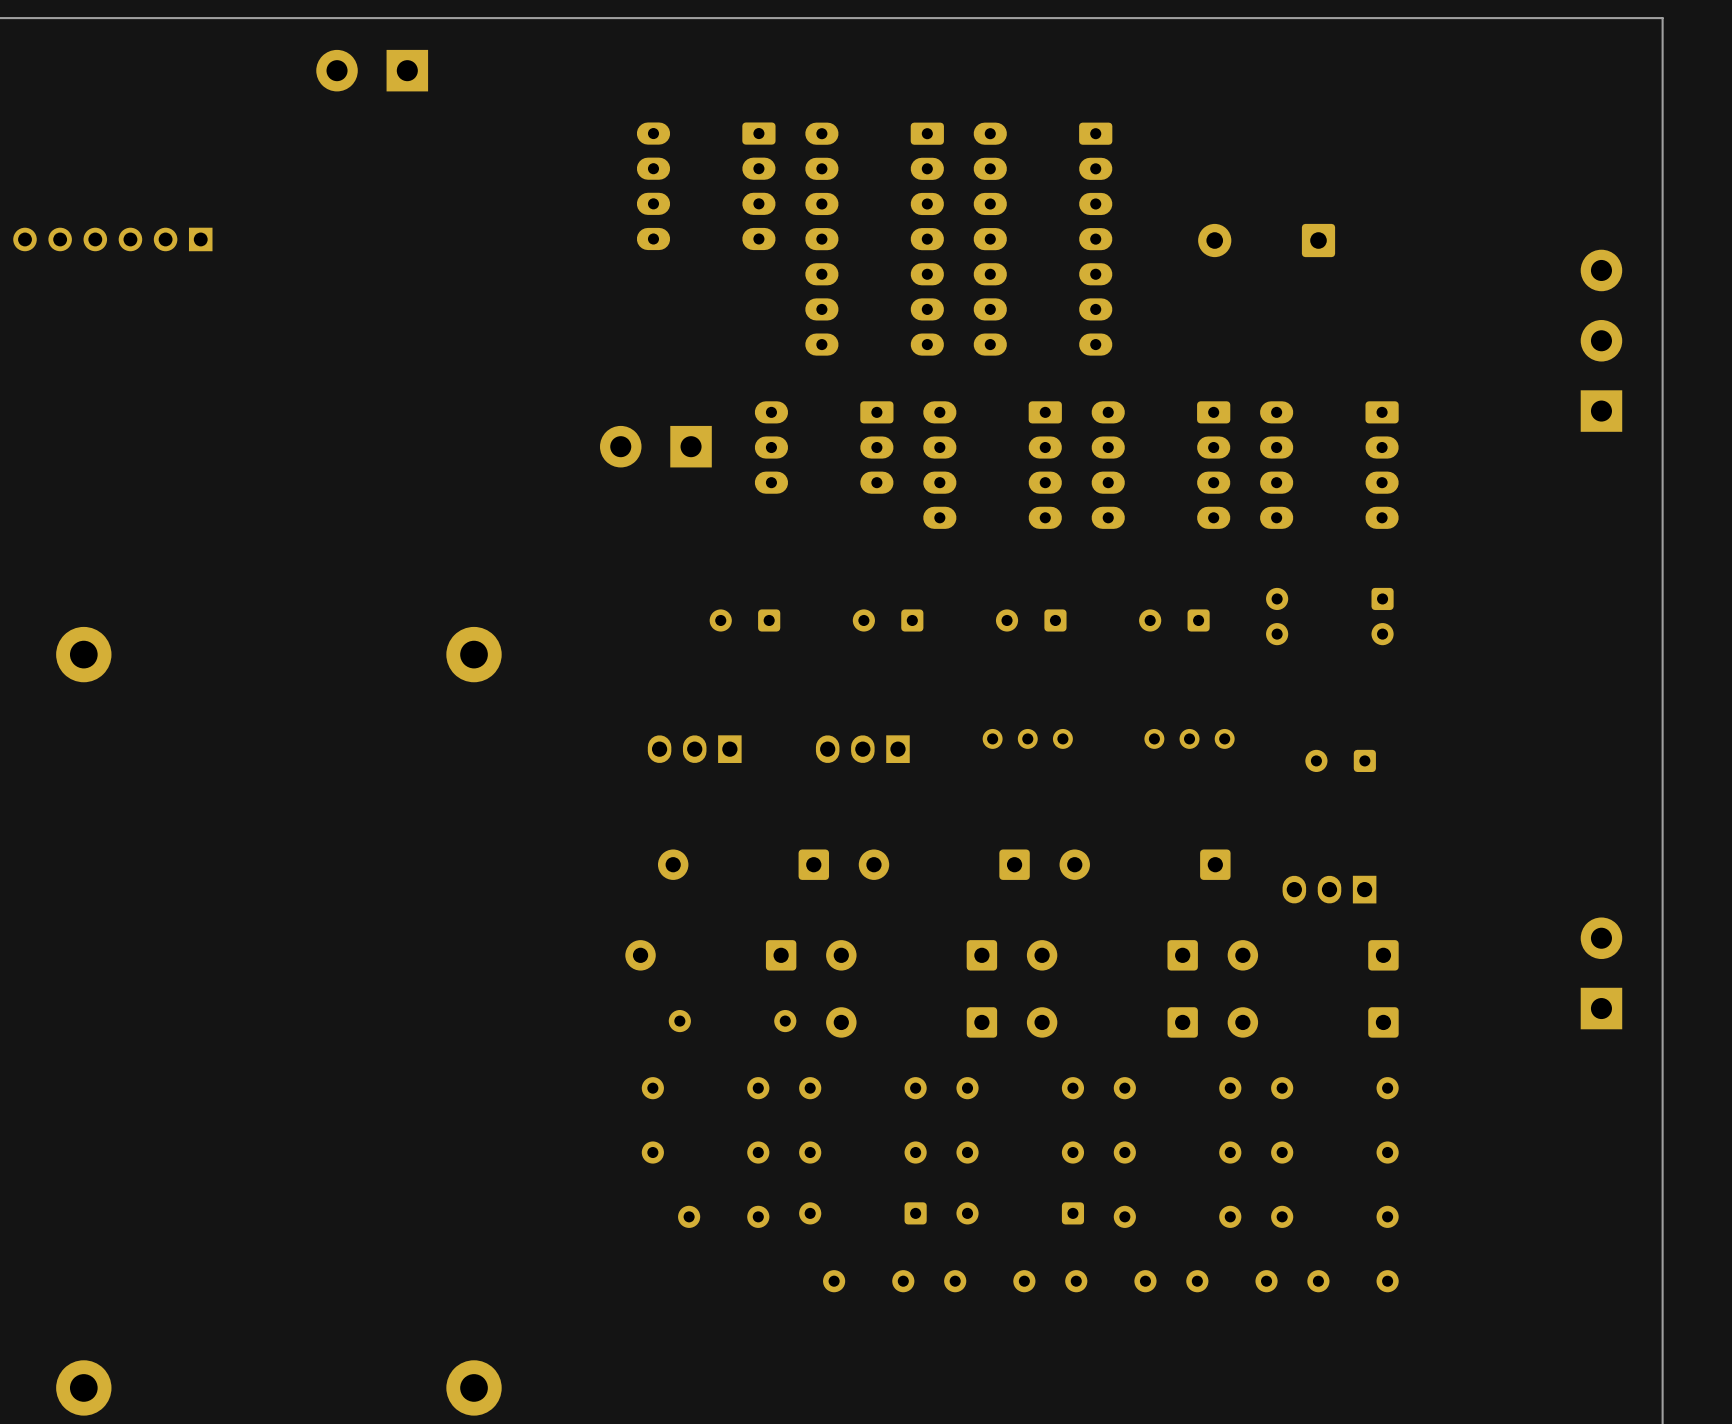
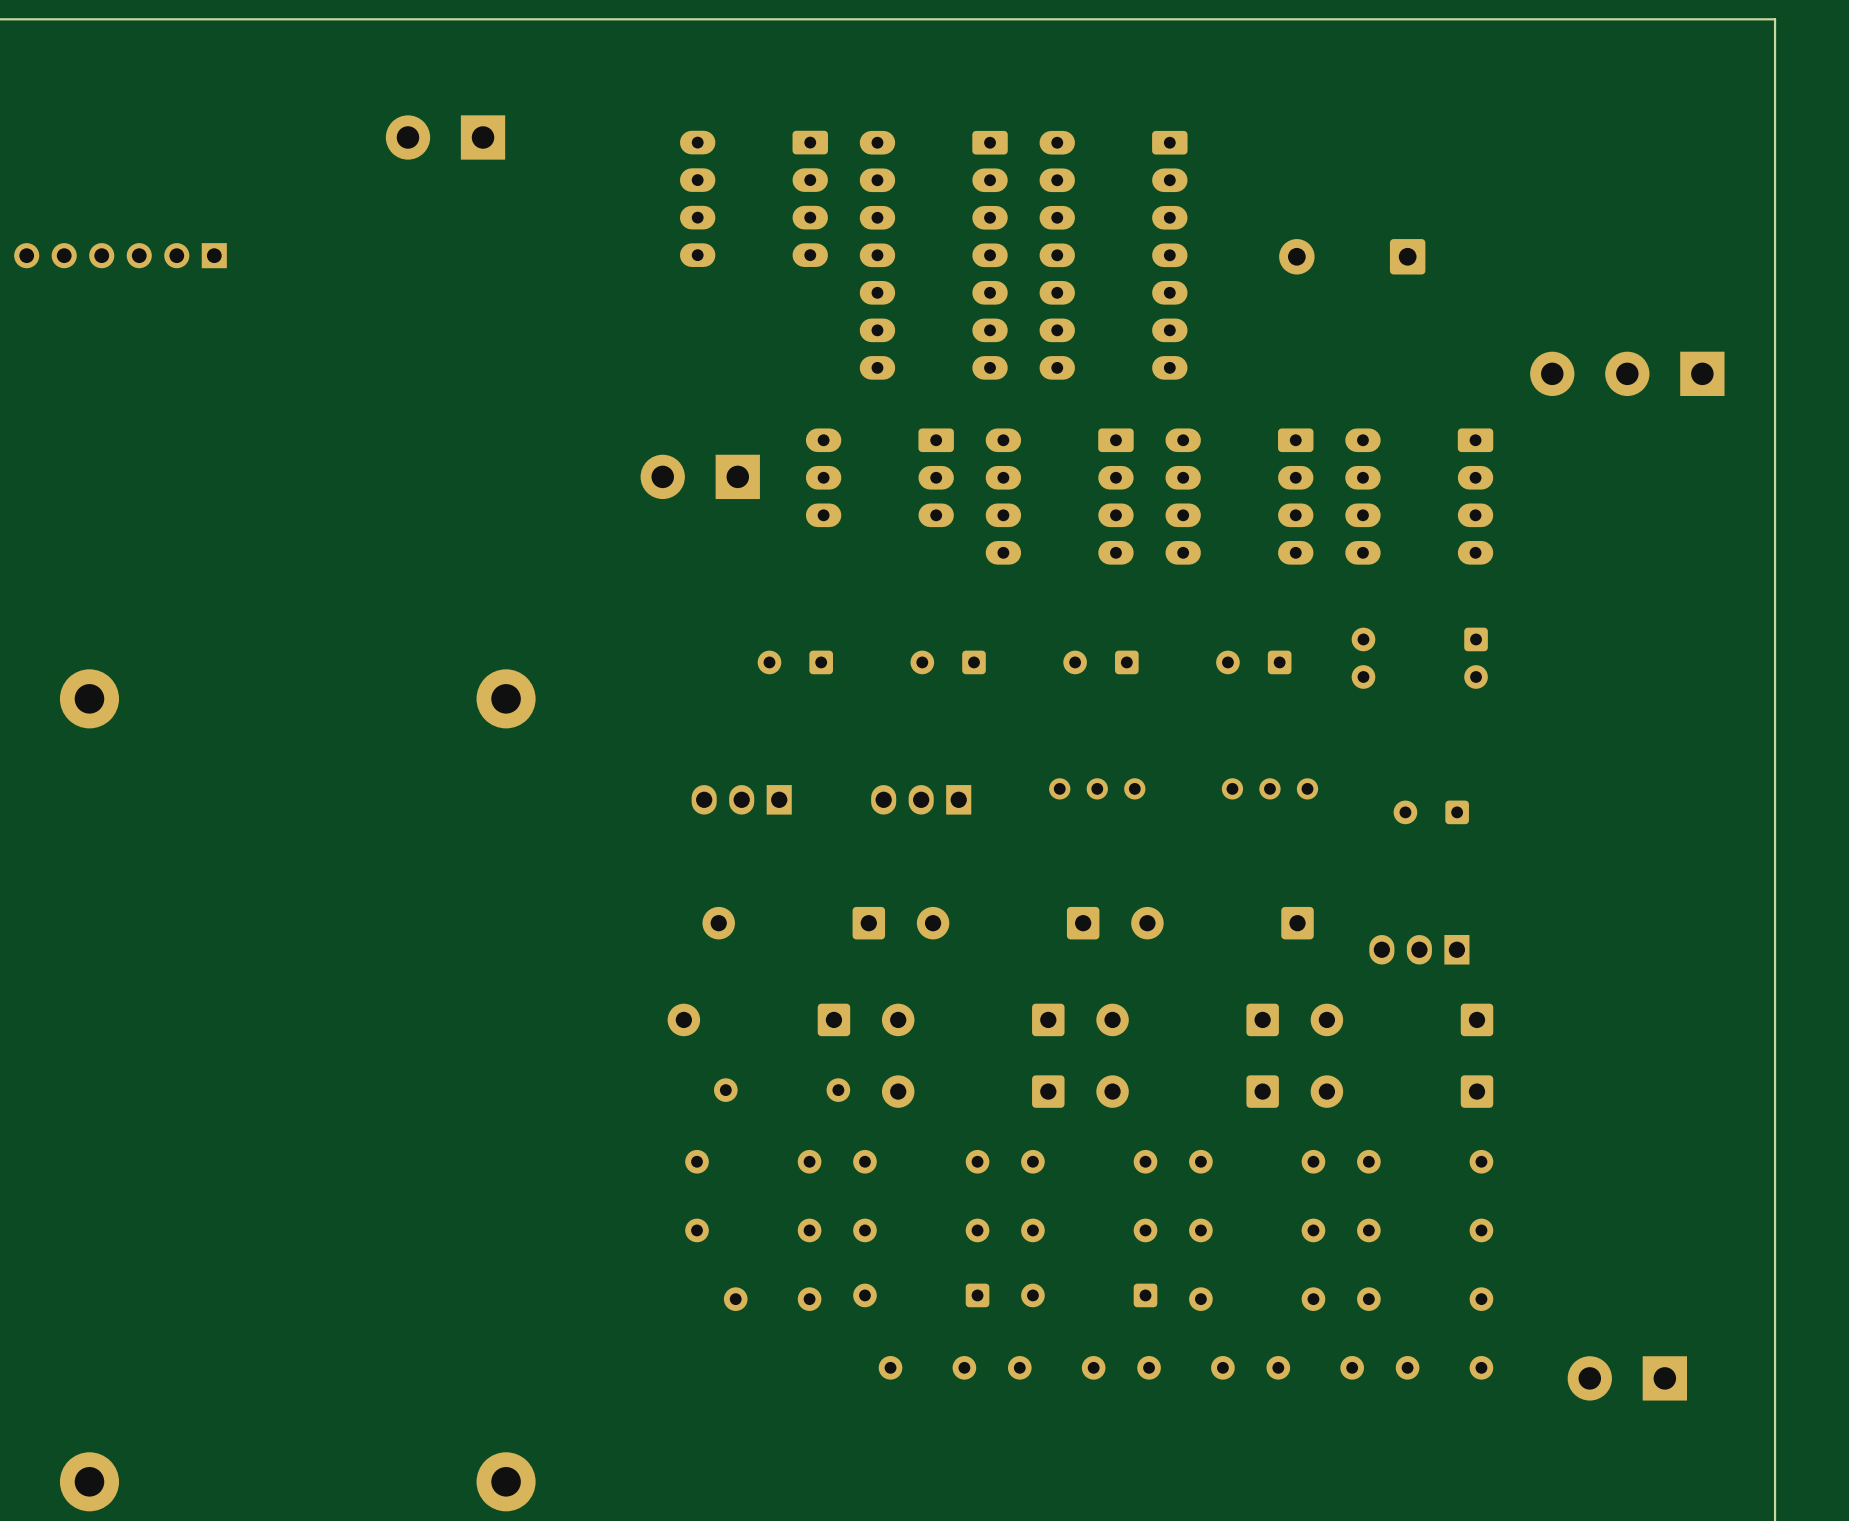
part position: (372, 70) -> (445, 137)
part rotation: 0° (1601, 340) -> 90° counterclockwise (1627, 373)
part rotation: 0° (1601, 973) -> 90° counterclockwise (1627, 1378)
part position: (1601, 973) -> (1627, 1378)

